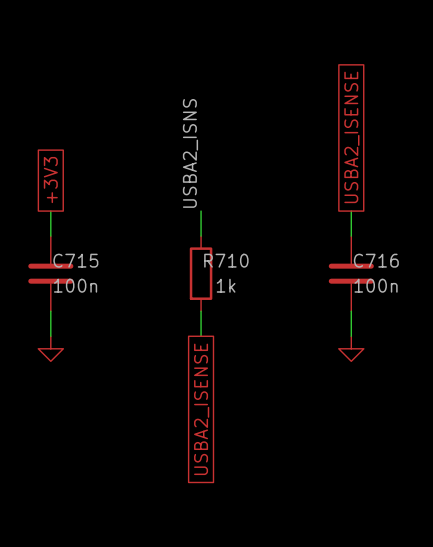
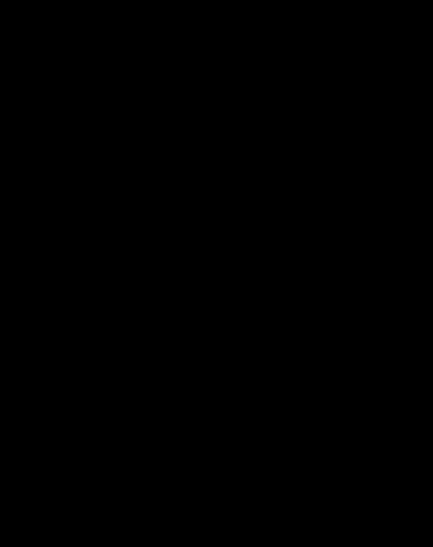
global label: USBA2_ISENSE (351, 137) -> none
label: USBA2_ISNS (190, 153) -> none
global label: +3V3 (50, 180) -> none
wire: (50, 211) (50, 236) -> none
wire: (201, 211) (201, 236) -> none
wire: (351, 211) (351, 236) -> none
C715: 100n (50, 273) -> none
R710: 1k (201, 273) -> none
C716: 100n (351, 273) -> none
wire: (50, 311) (50, 336) -> none
wire: (201, 311) (201, 336) -> none
wire: (351, 311) (351, 336) -> none
power symbol: (50, 348) -> none
power symbol: (351, 348) -> none
global label: USBA2_ISENSE (201, 409) -> none

